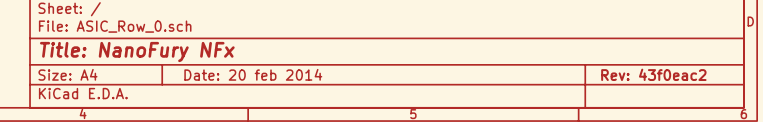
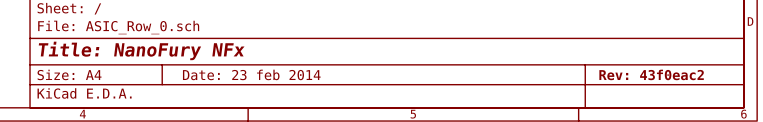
title block: Date: 20 feb 2014 (253, 74) -> Date: 23 feb 2014 (251, 74)

